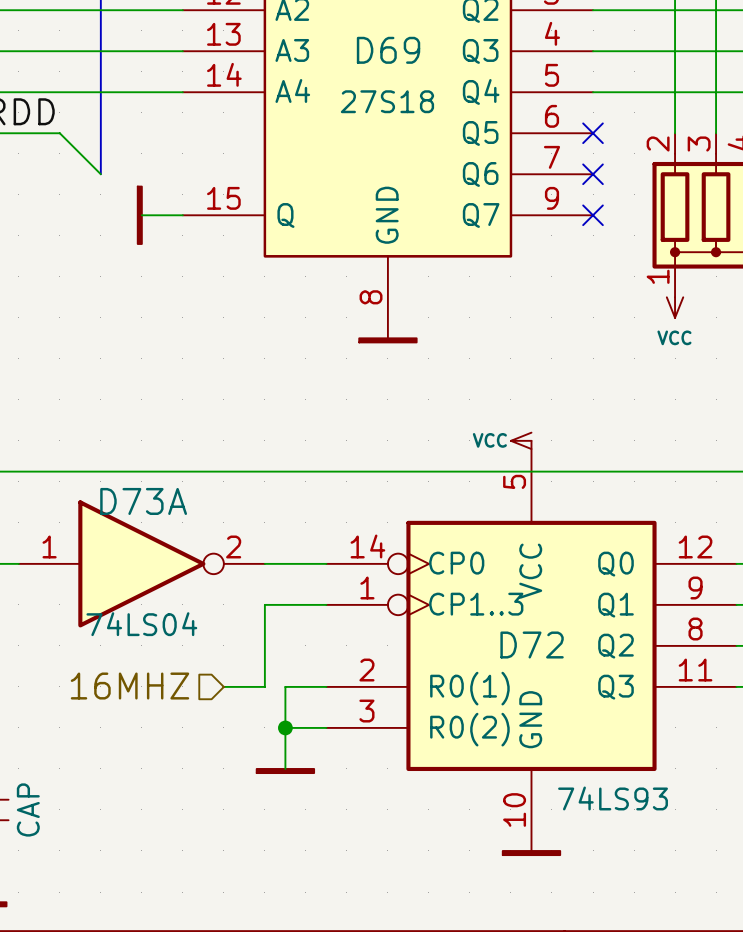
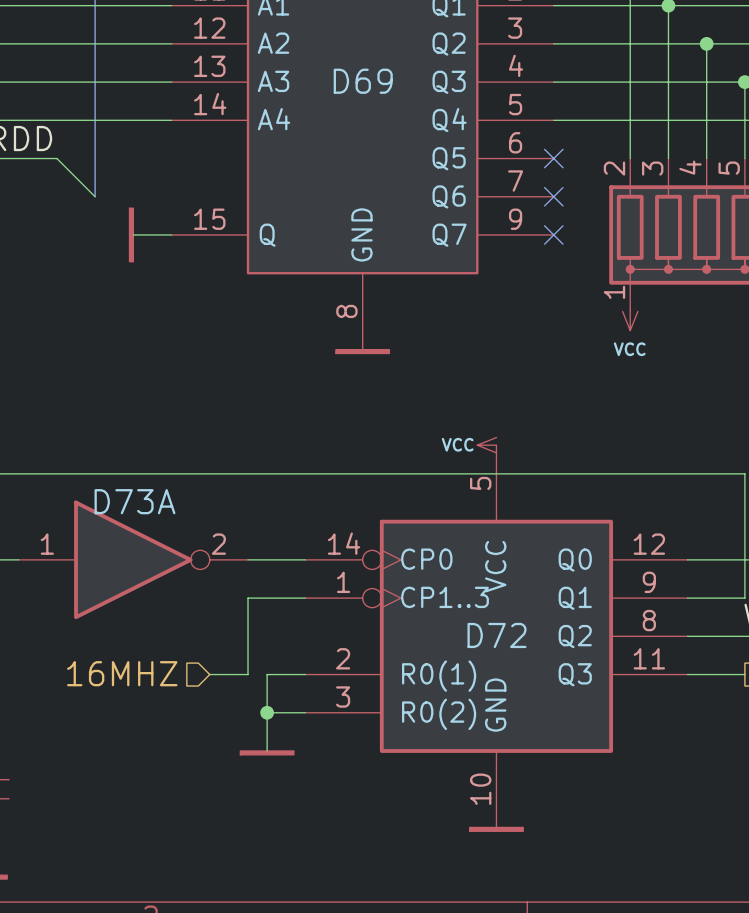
D69 value: 27S18 (387, 101) -> none
D73A value: 74LS04 (141, 624) -> none
D72 value: 74LS93 (613, 798) -> none
part value: CAP (28, 809) -> none

